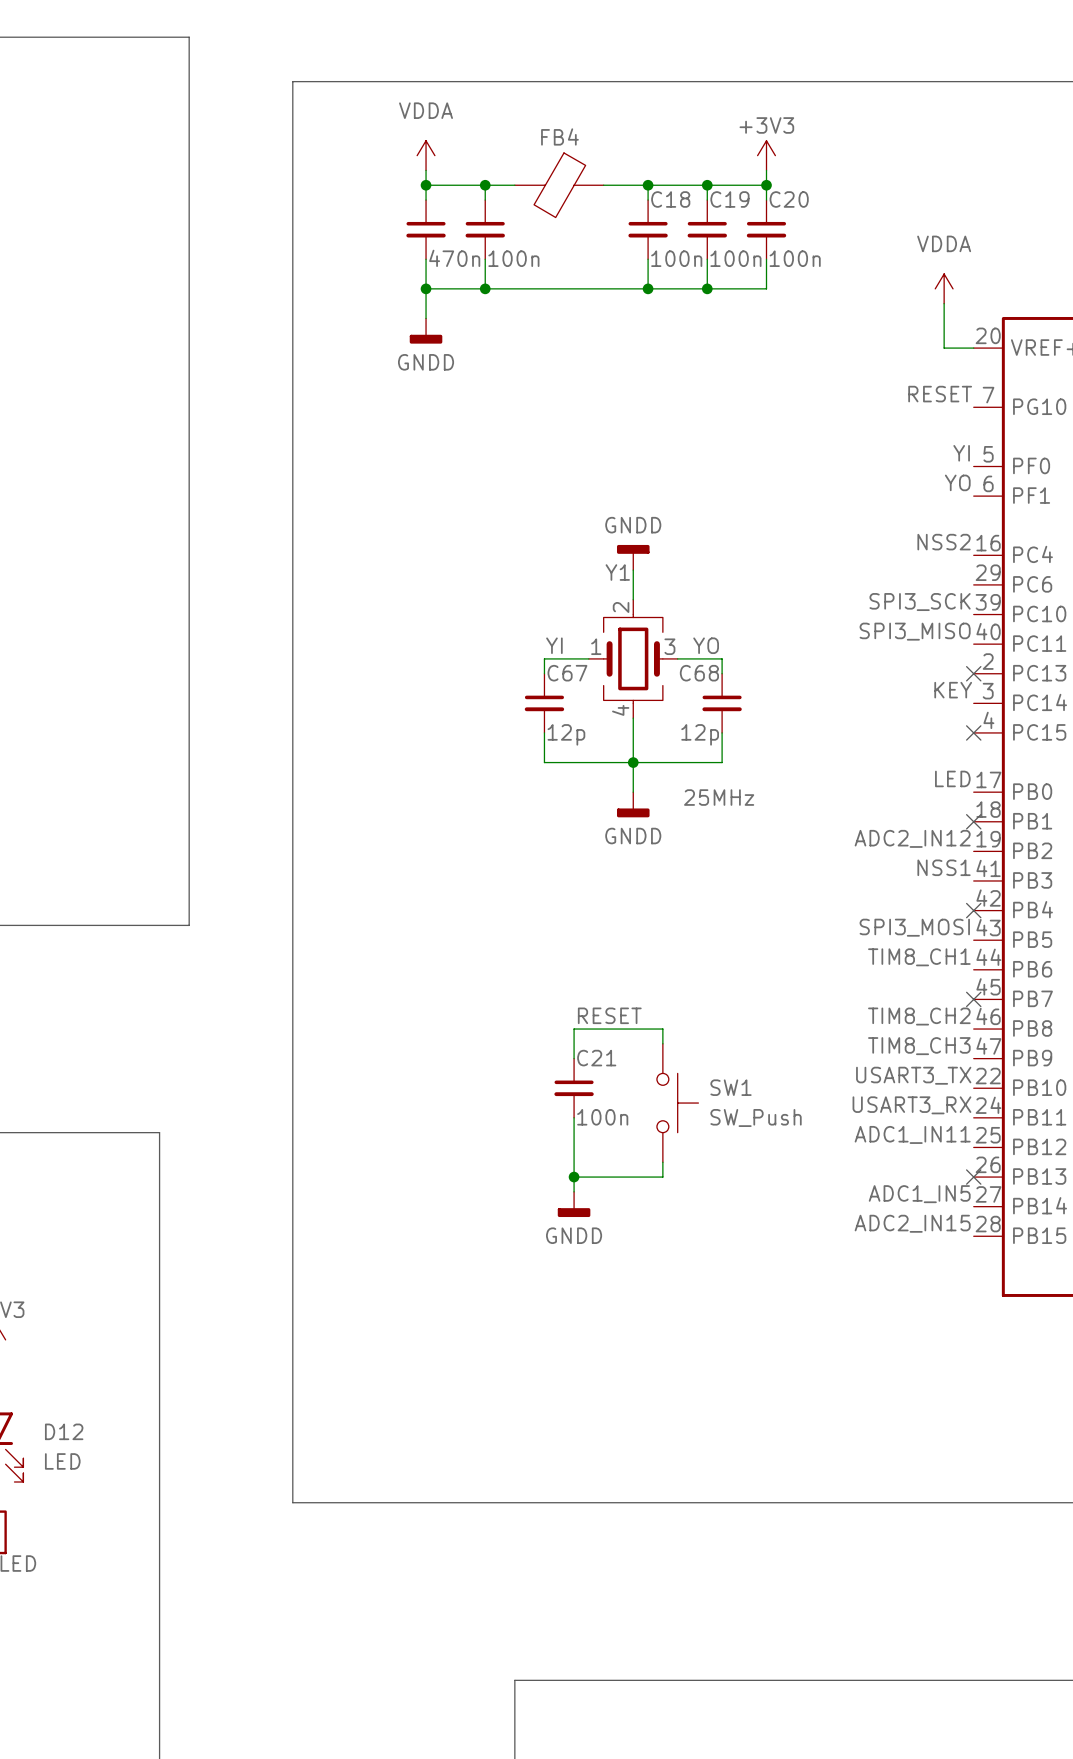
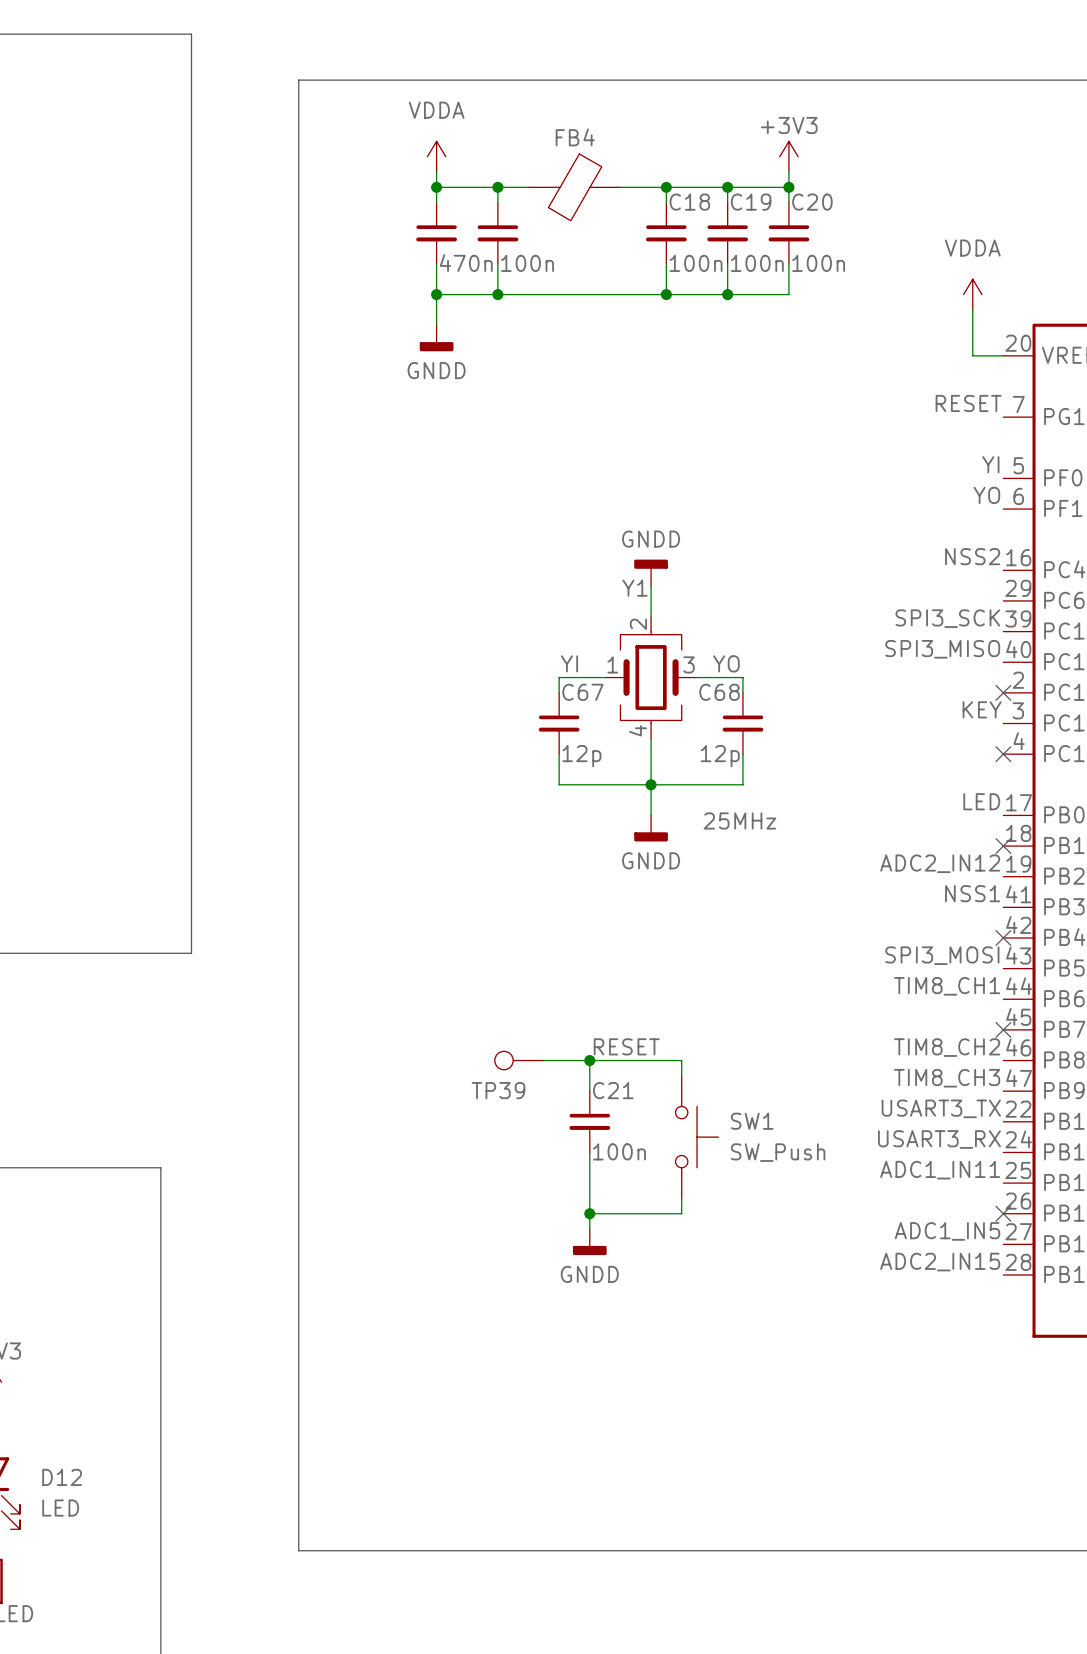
TP39: none -> (519, 1060)
wire: none -> (543, 1060) (589, 1060)
junction: none -> (589, 1060)

